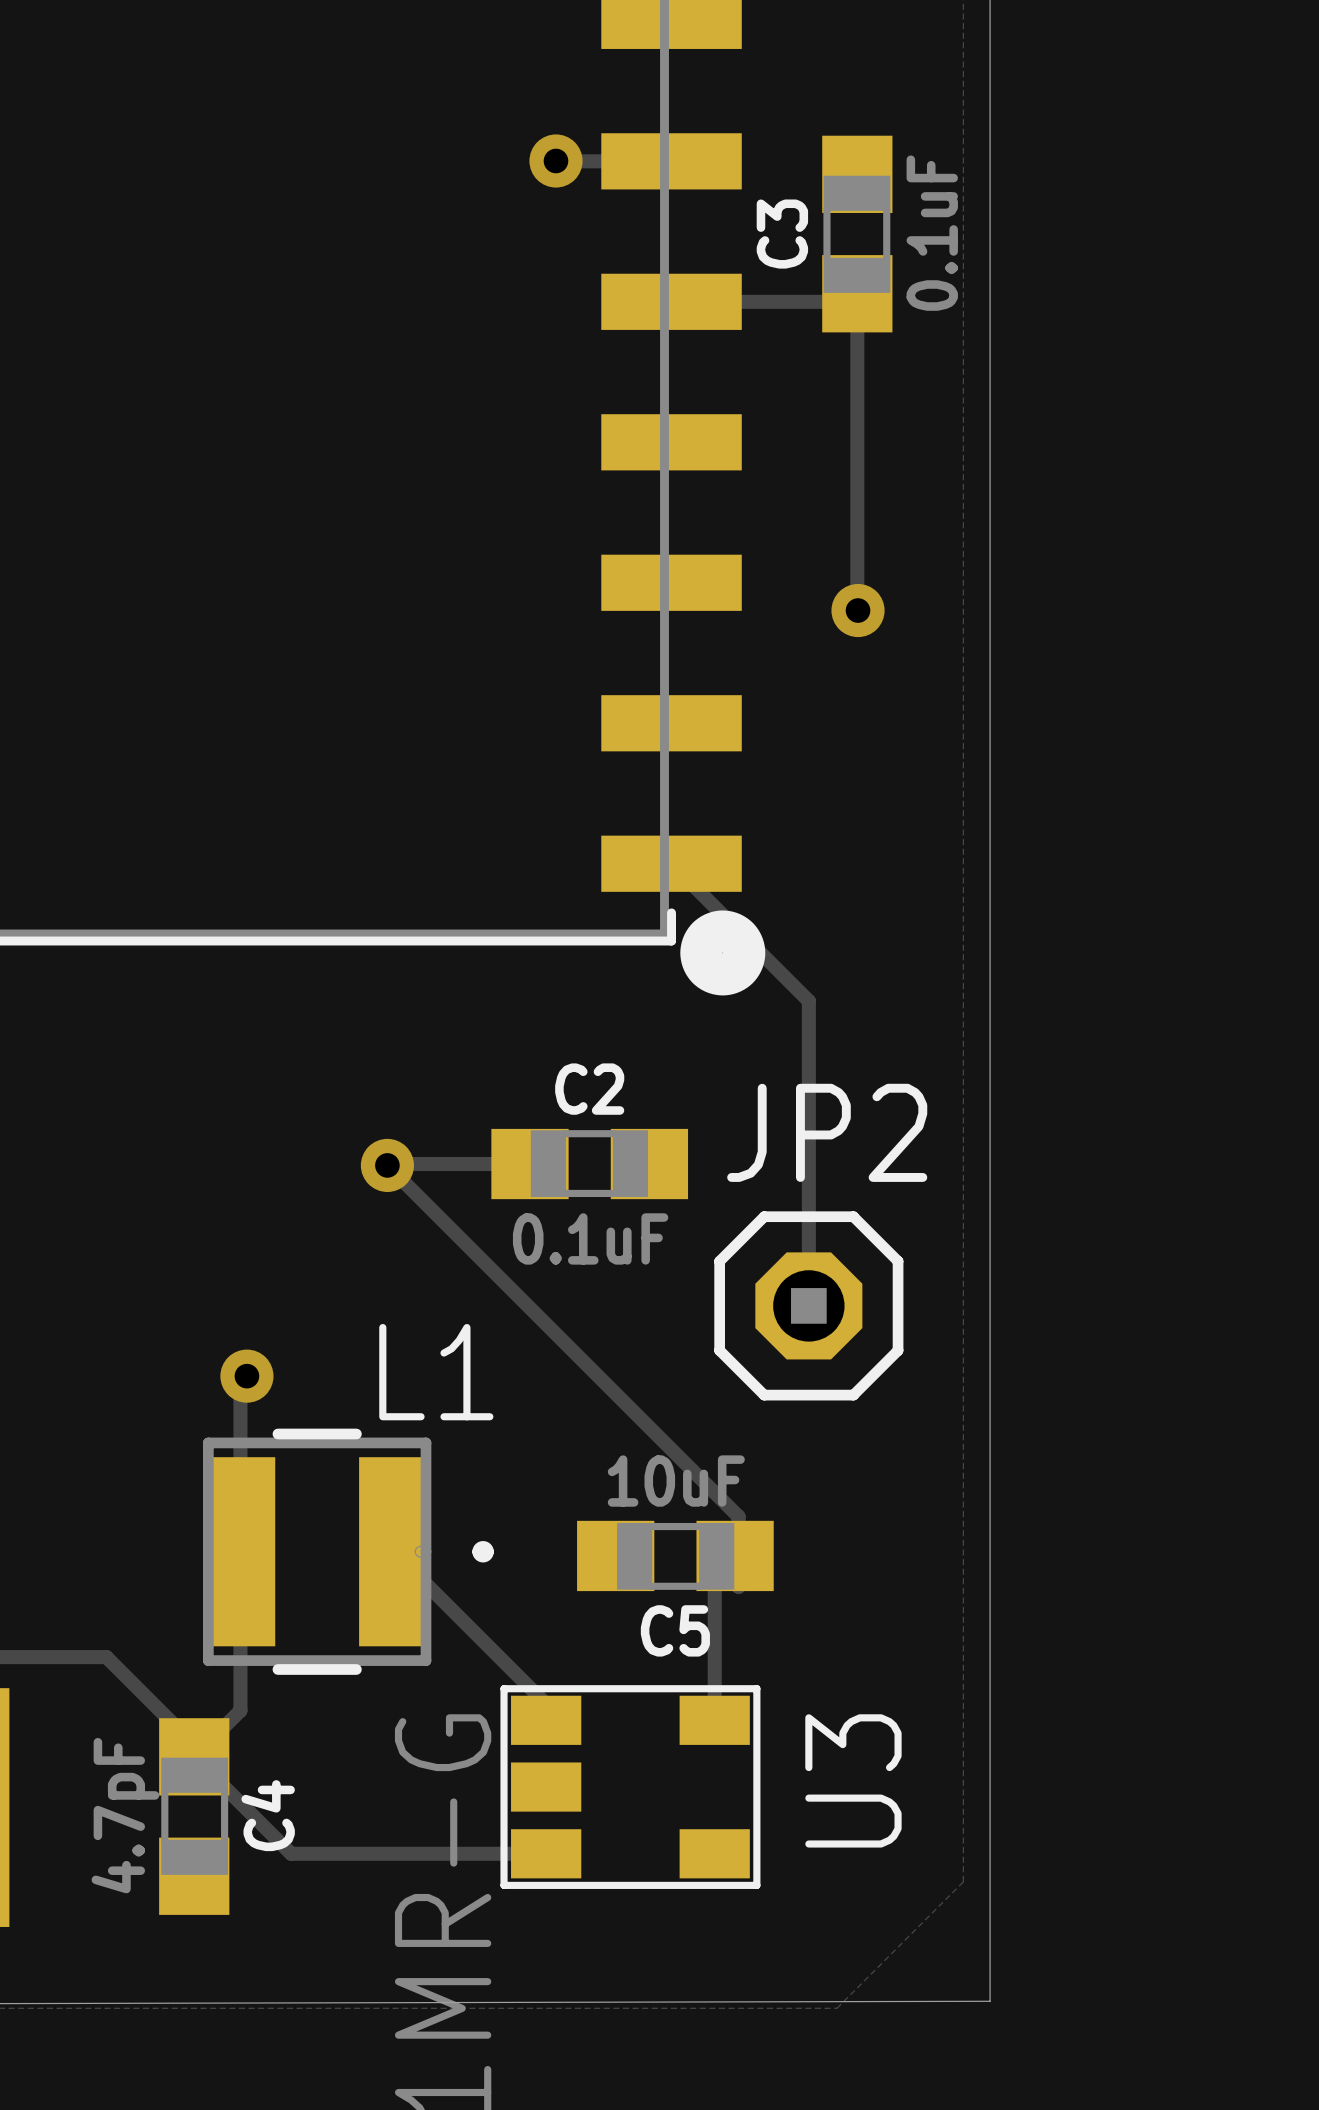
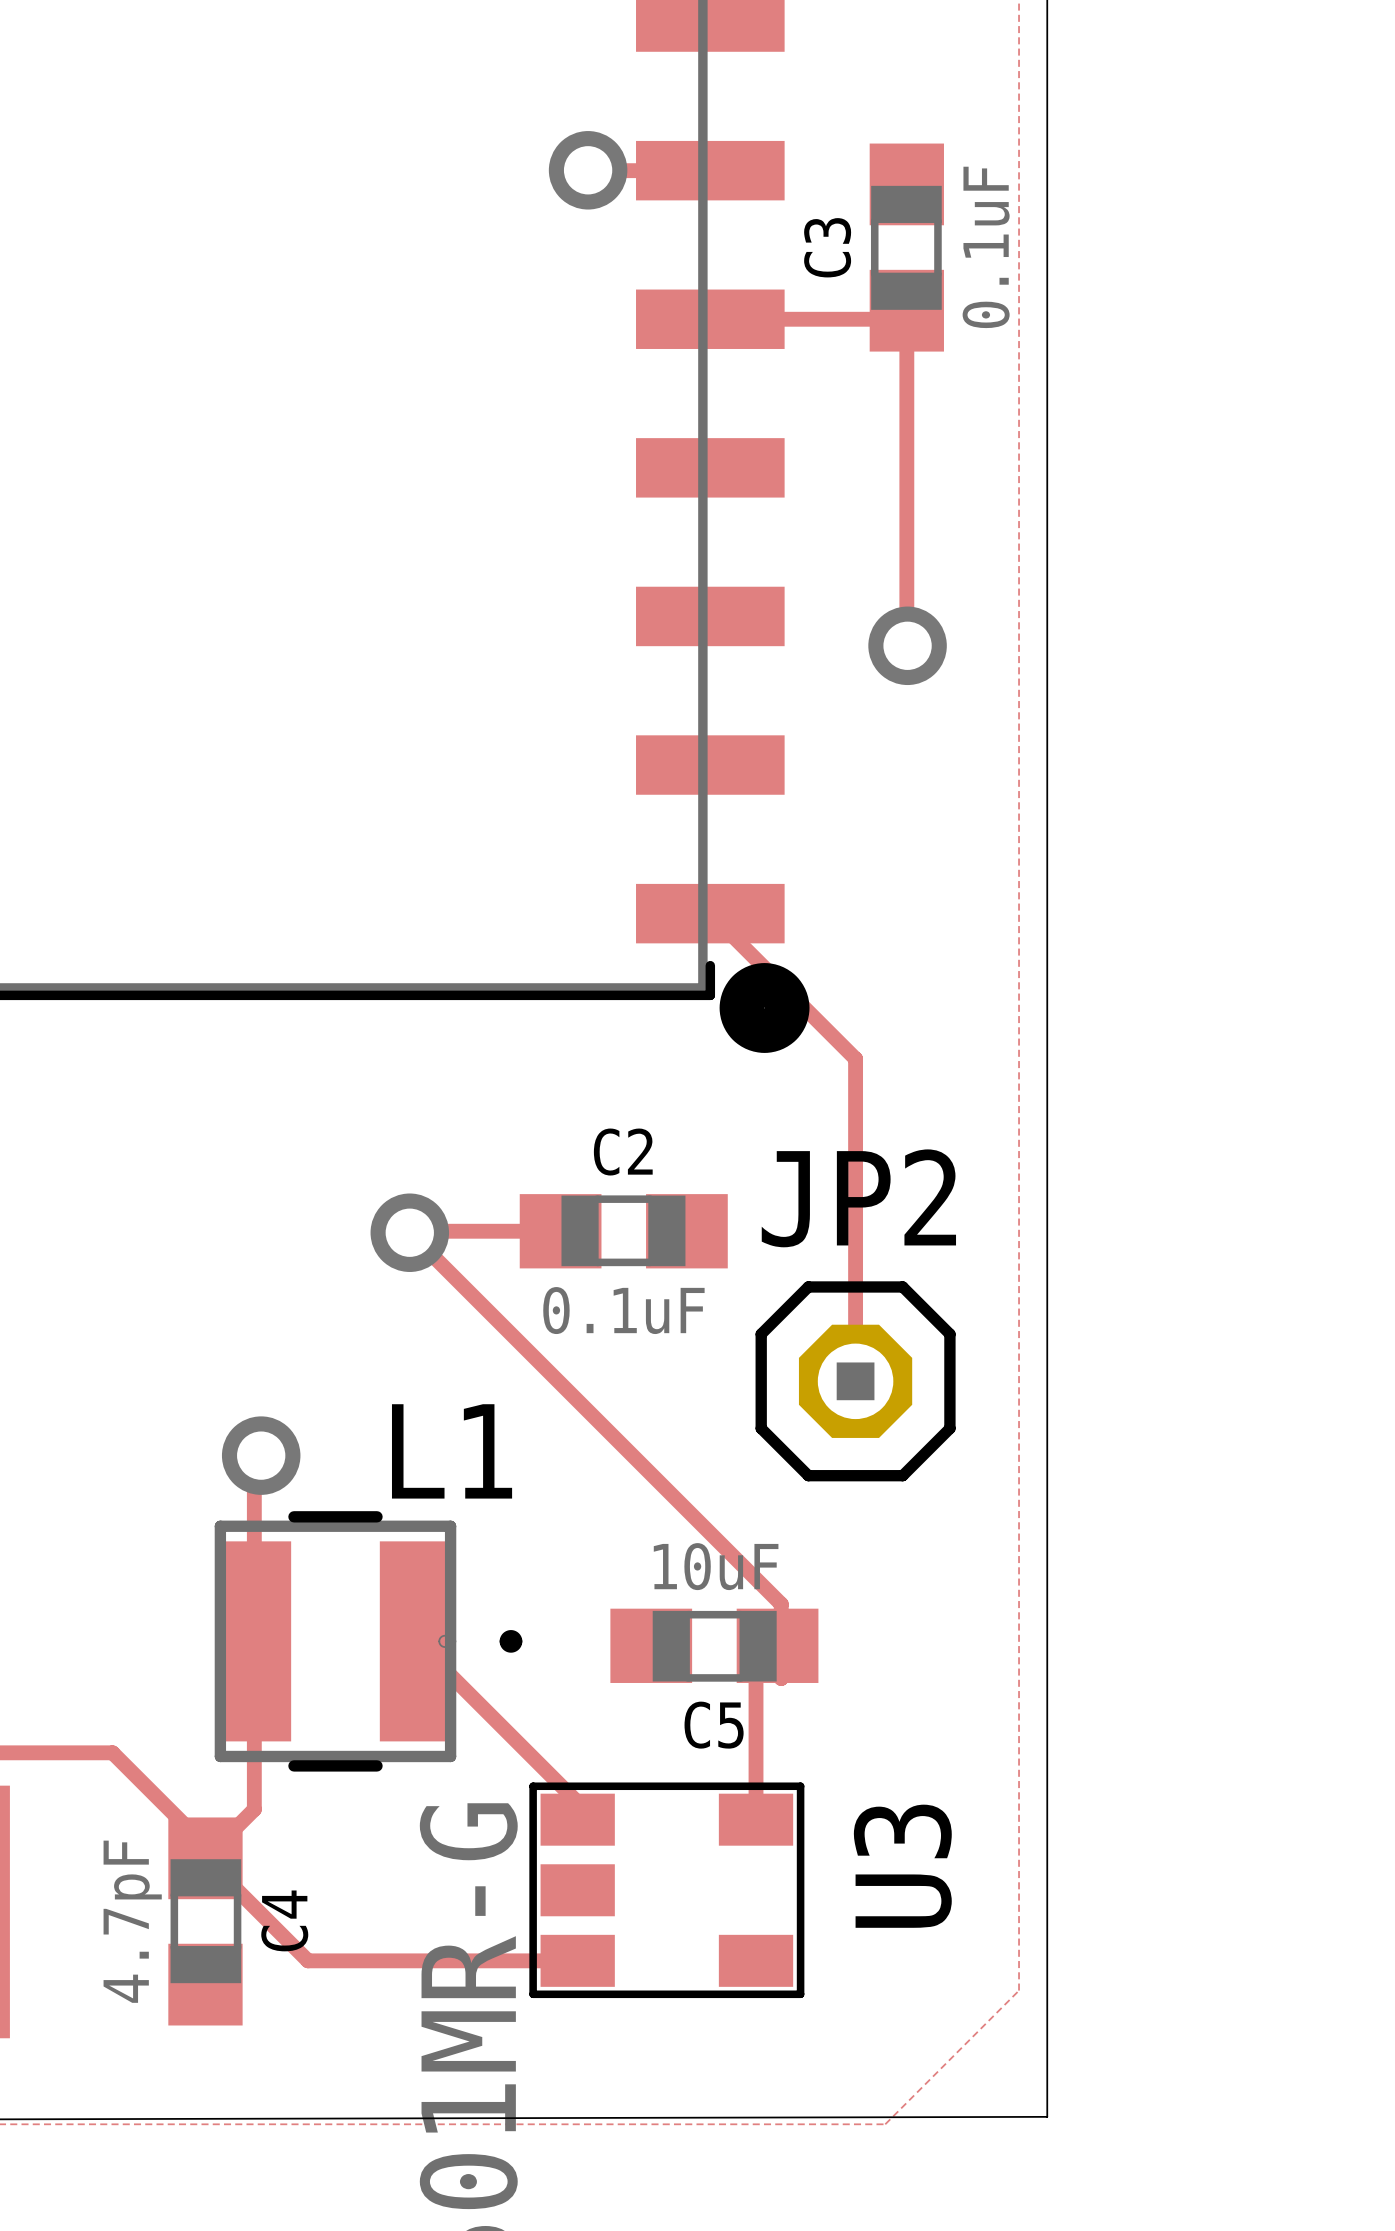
via size: [529, 134, 583, 188] -> [548, 131, 628, 210]
via size: [831, 583, 885, 638] -> [868, 606, 947, 686]
via size: [360, 1138, 414, 1192] -> [370, 1193, 450, 1272]
via size: [220, 1349, 274, 1403] -> [221, 1416, 301, 1495]

